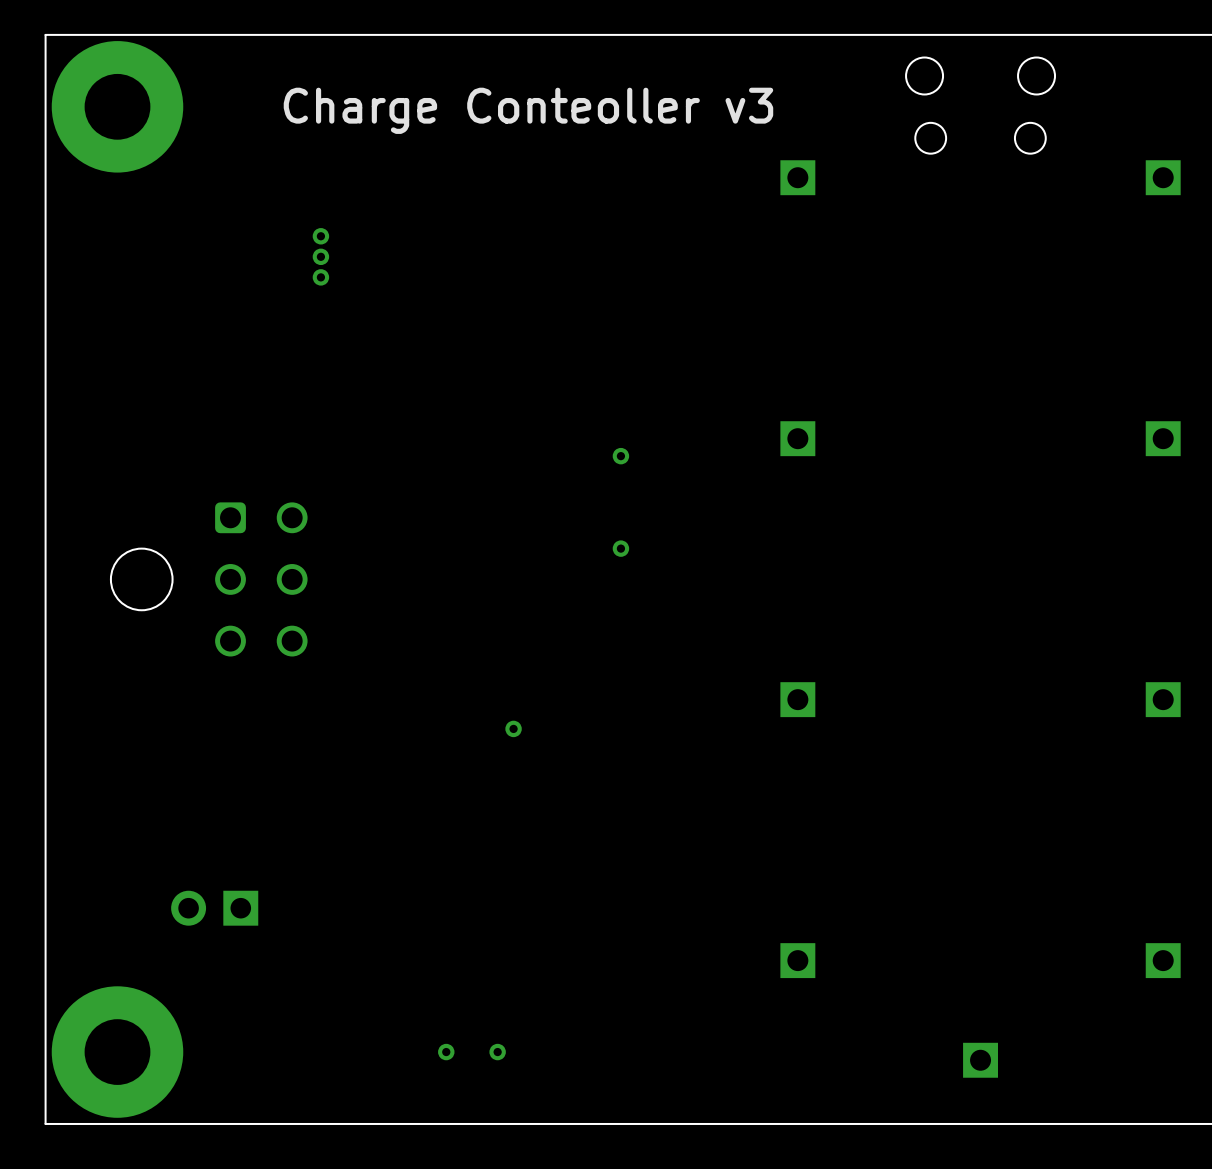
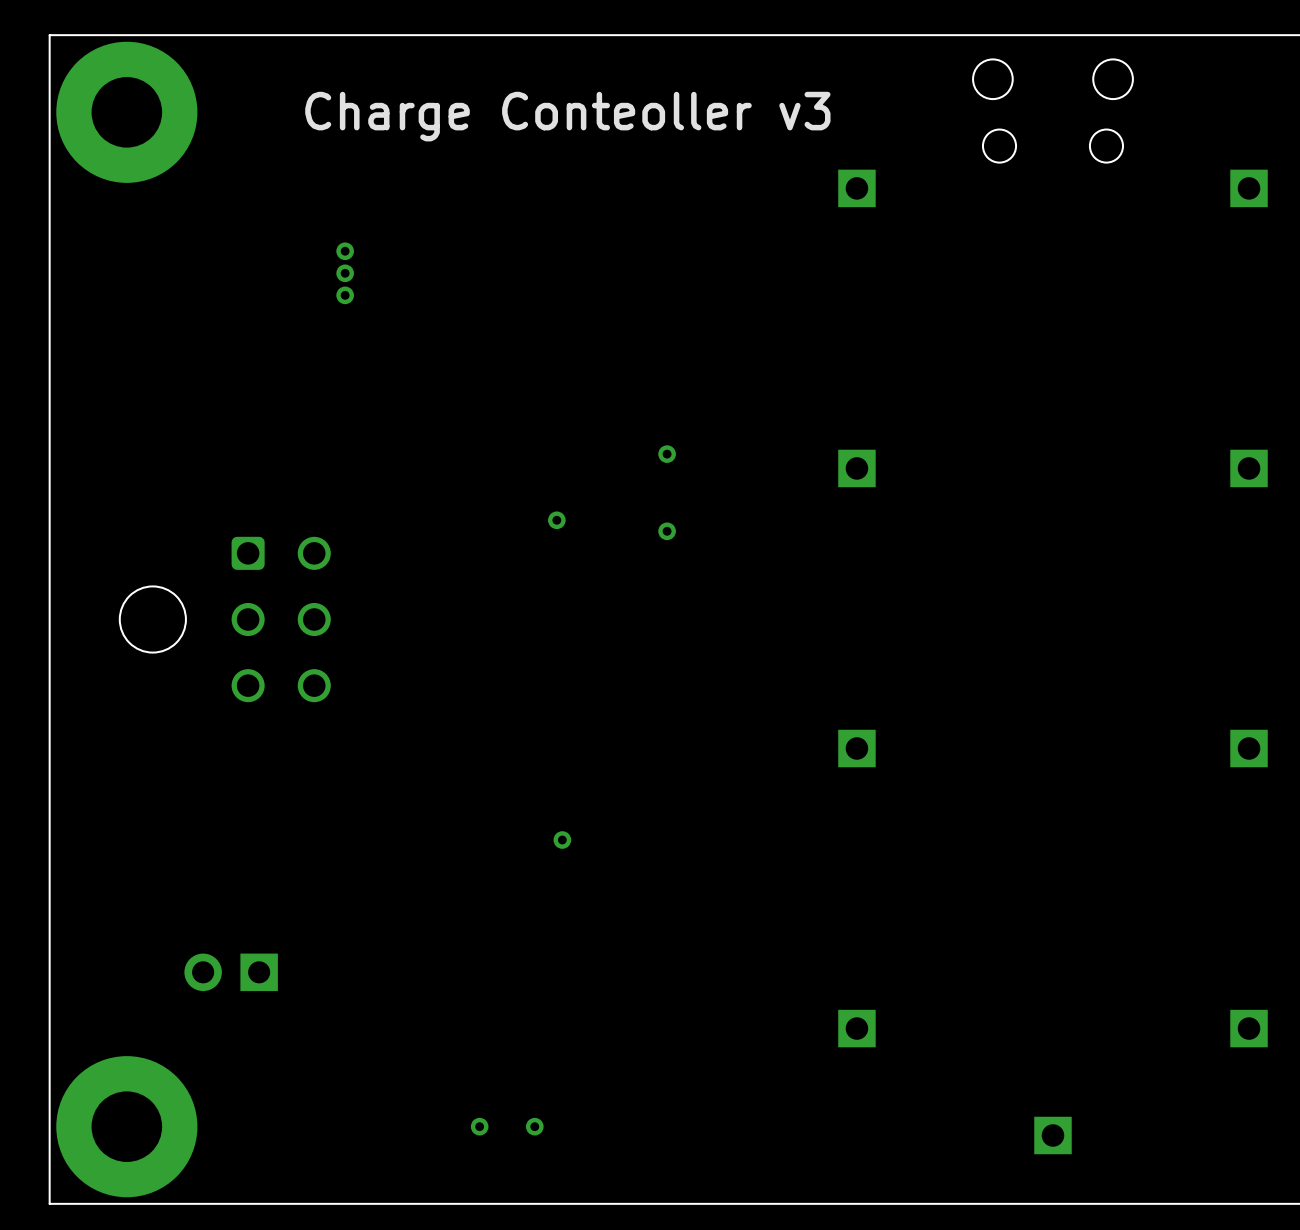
via: none -> (667, 454)
via: (620, 456) -> none
via: none -> (556, 520)
via: none -> (667, 531)
via: (620, 548) -> none
via position: (513, 728) -> (562, 840)

